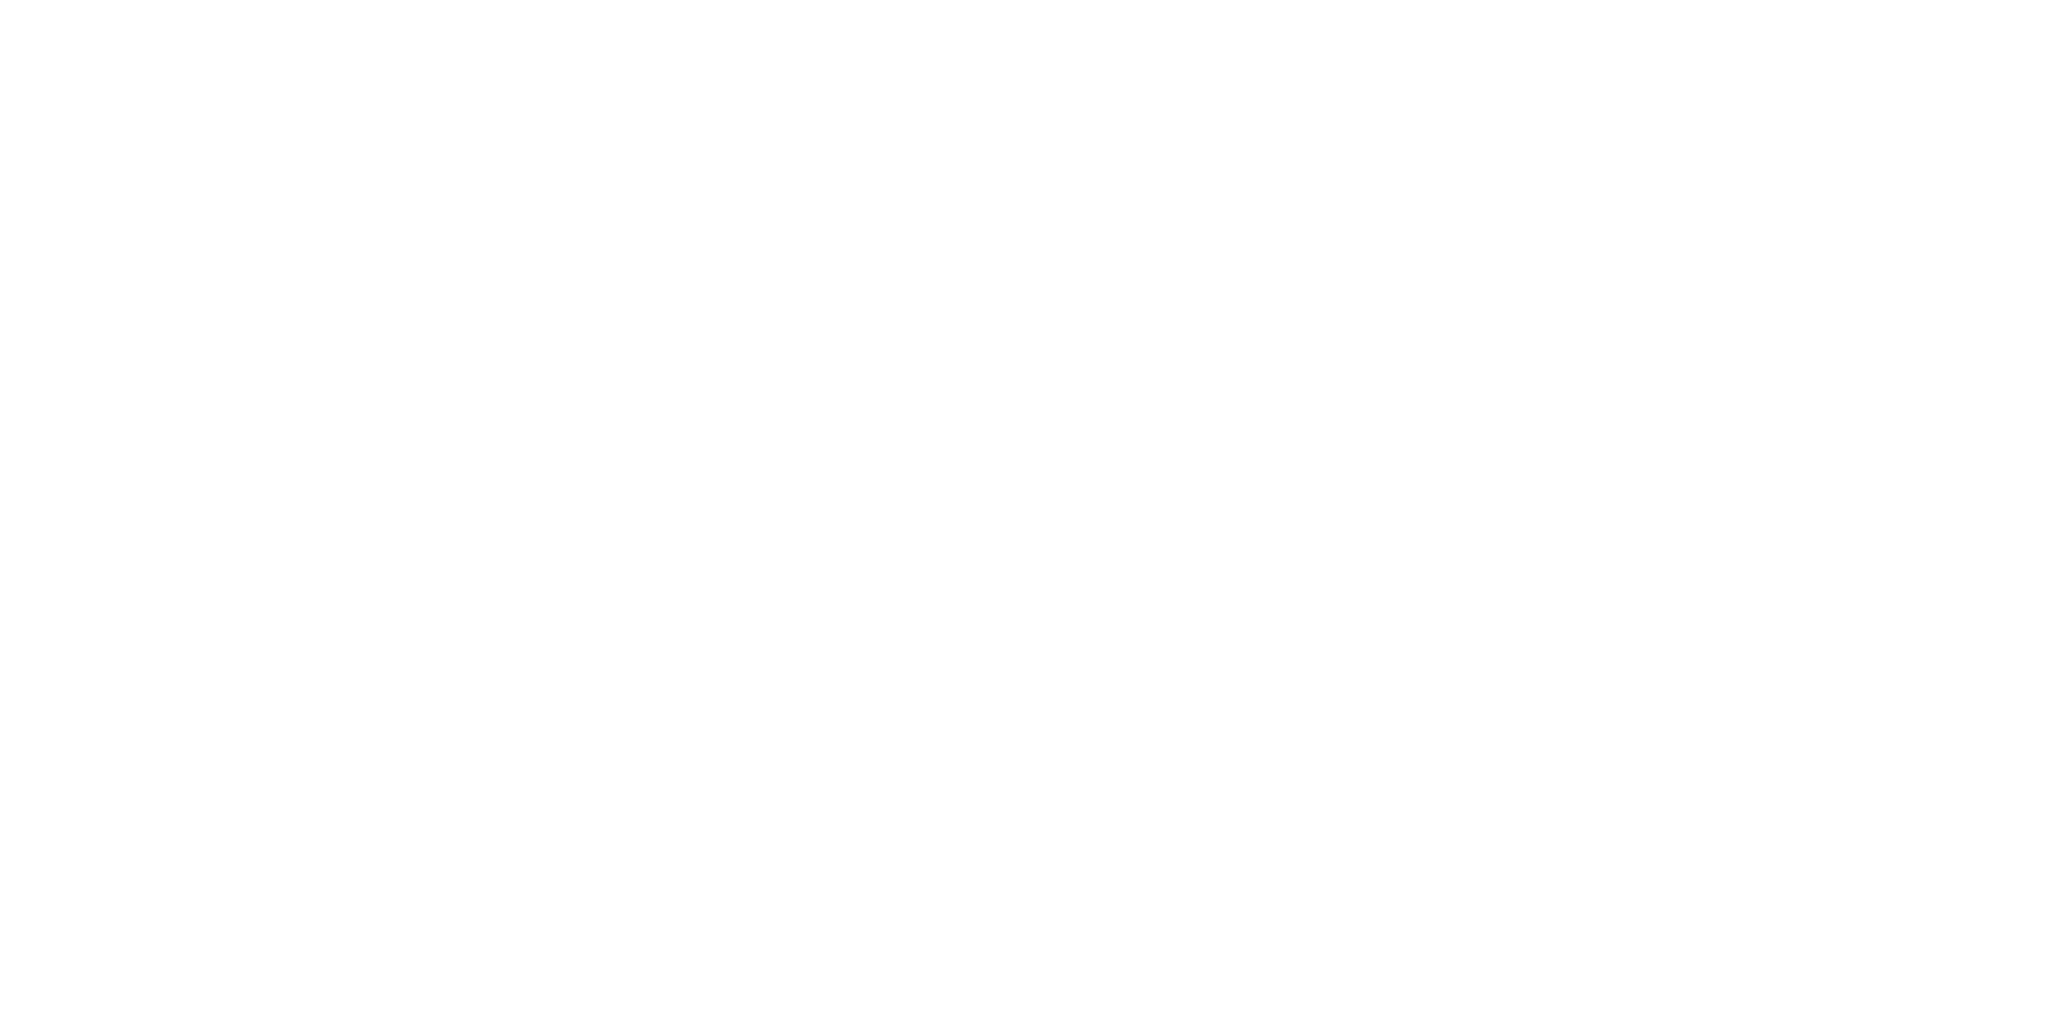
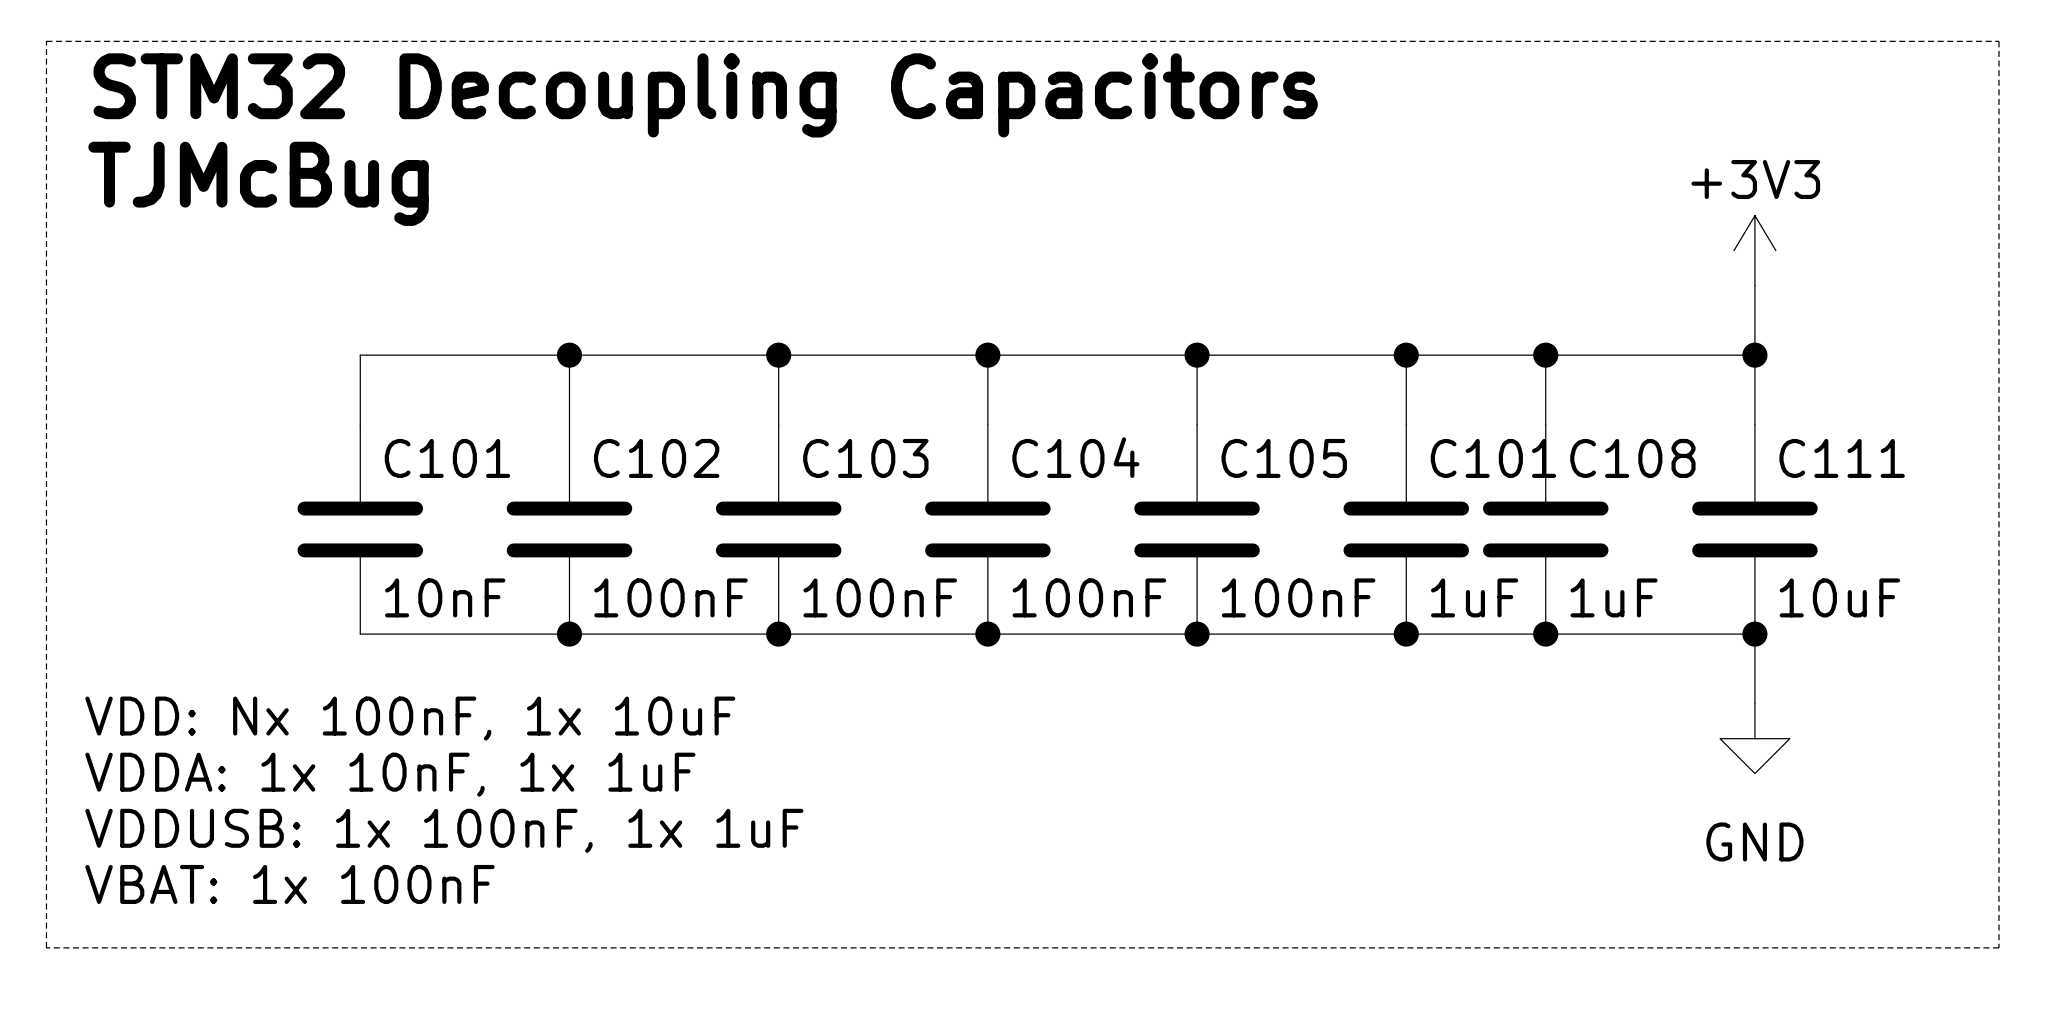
line: none -> (46, 41) (1998, 41) (1998, 947) (46, 947) (46, 41)
text: none -> STM32 Decoupling Capacitors (705, 95)
text: none -> TJMcBug (258, 183)
power symbol: none -> +3V3 (1754, 250)
wire: none -> (1754, 285) (1754, 424)
wire: none -> (569, 355) (569, 424)
junction: none -> (569, 355)
wire: none -> (778, 355) (778, 424)
junction: none -> (778, 355)
wire: none -> (987, 355) (987, 424)
junction: none -> (987, 355)
wire: none -> (1197, 355) (1197, 424)
junction: none -> (1197, 355)
wire: none -> (1406, 355) (1406, 424)
junction: none -> (1406, 355)
wire: none -> (1545, 355) (1545, 424)
junction: none -> (1545, 355)
wire: none -> (1754, 355) (360, 355) (360, 424)
junction: none -> (1754, 355)
C101: none -> 10nF (360, 529)
C102: none -> 100nF (569, 529)
C103: none -> 100nF (778, 529)
C104: none -> 100nF (987, 529)
C105: none -> 100nF (1197, 529)
C101: none -> 1uF (1406, 529)
C108: none -> 1uF (1545, 529)
C111: none -> 10uF (1754, 529)
wire: none -> (360, 634) (1754, 634) (1754, 703)
junction: none -> (569, 634)
junction: none -> (778, 634)
junction: none -> (987, 634)
junction: none -> (1197, 634)
junction: none -> (1406, 634)
junction: none -> (1545, 634)
junction: none -> (1754, 634)
text: none -> VDD: Nx 100nF, 1x 10uF (410, 718)
power symbol: none -> GND (1754, 738)
text: none -> VDDA: 1x 10nF, 1x 1uF (390, 774)
text: none -> VDDUSB: 1x 100nF, 1x 1uF (444, 830)
text: none -> VBAT: 1x 100nF (289, 884)

